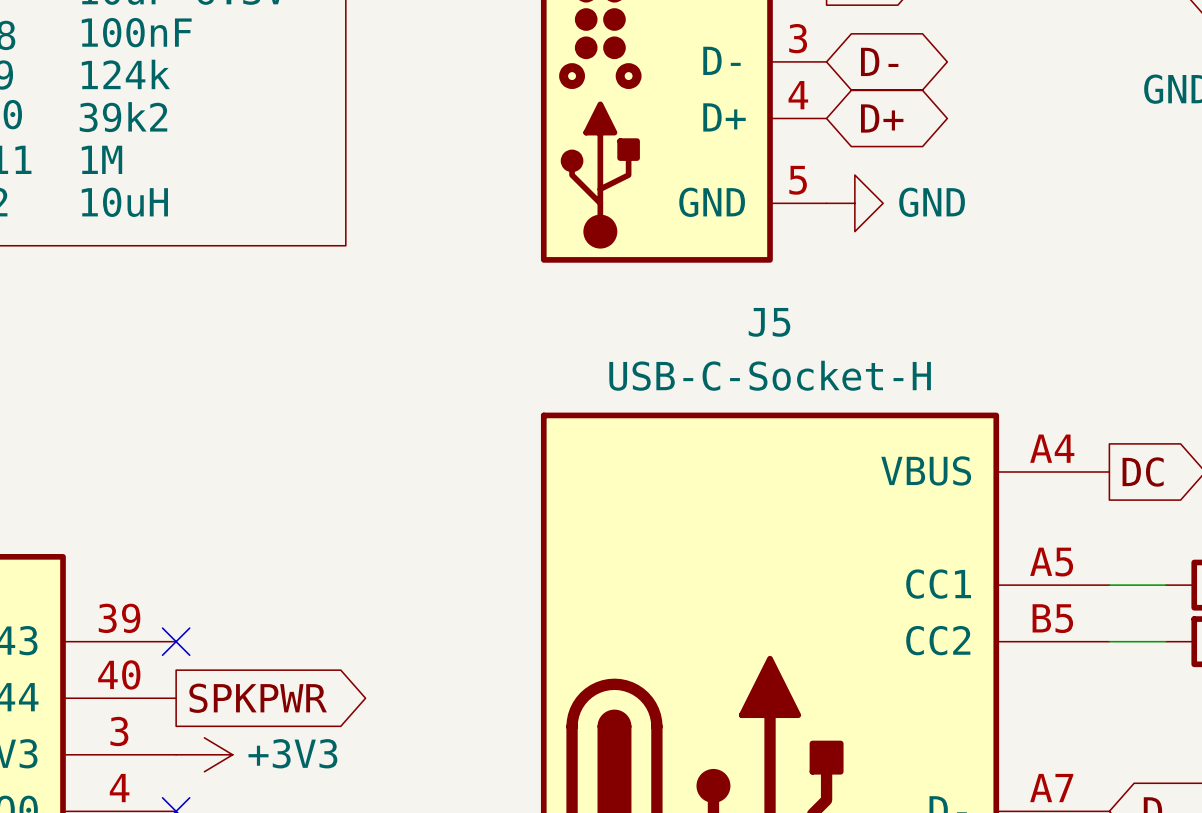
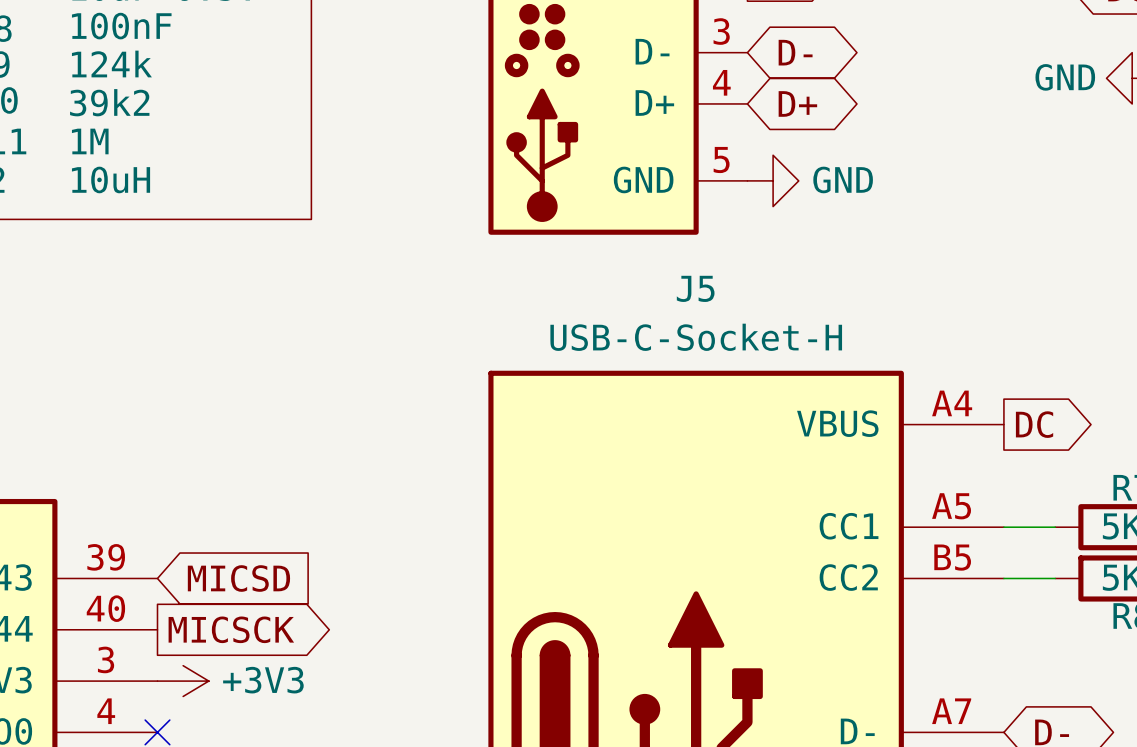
no-connect mark: (176, 641) -> none
global label: none -> MICSD (238, 578)
global label: SPKPWR (258, 698) -> MICSCK (231, 629)

